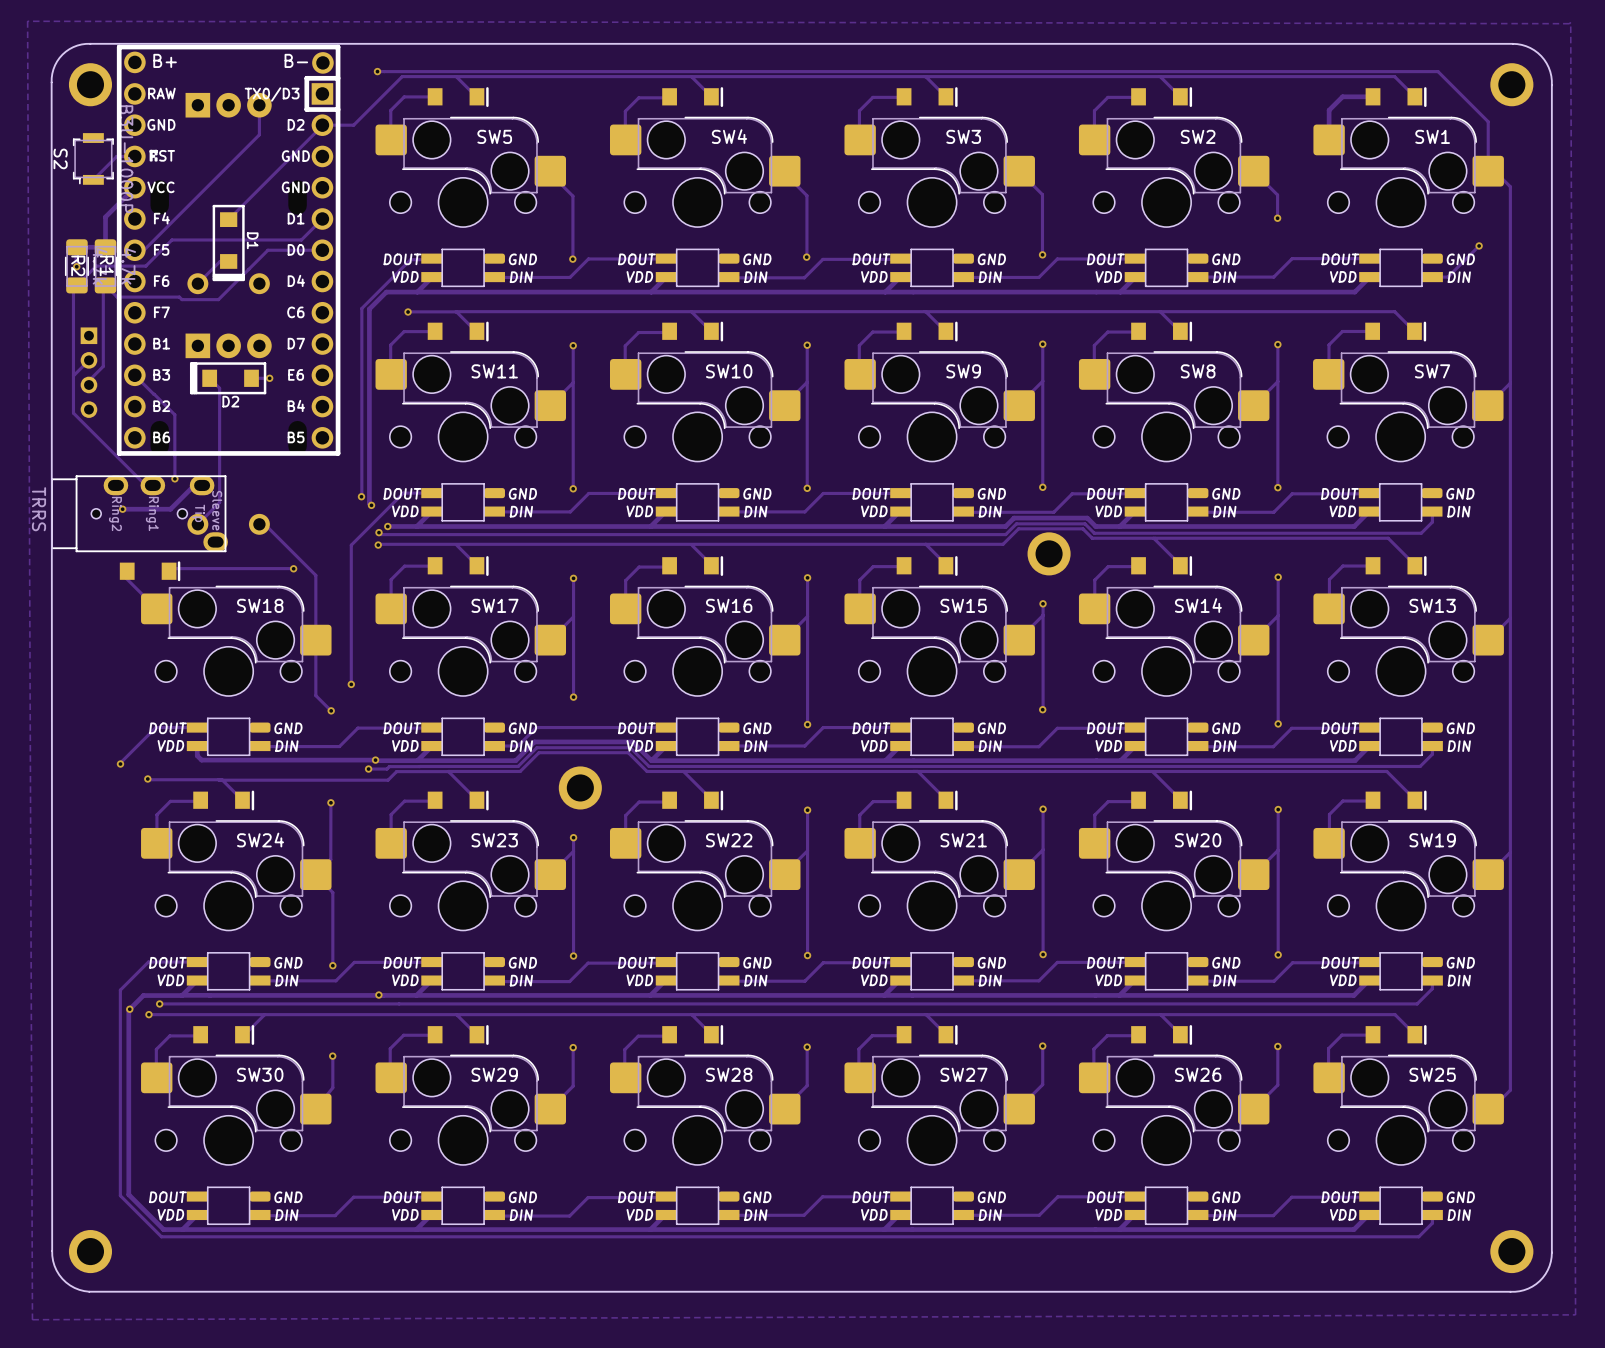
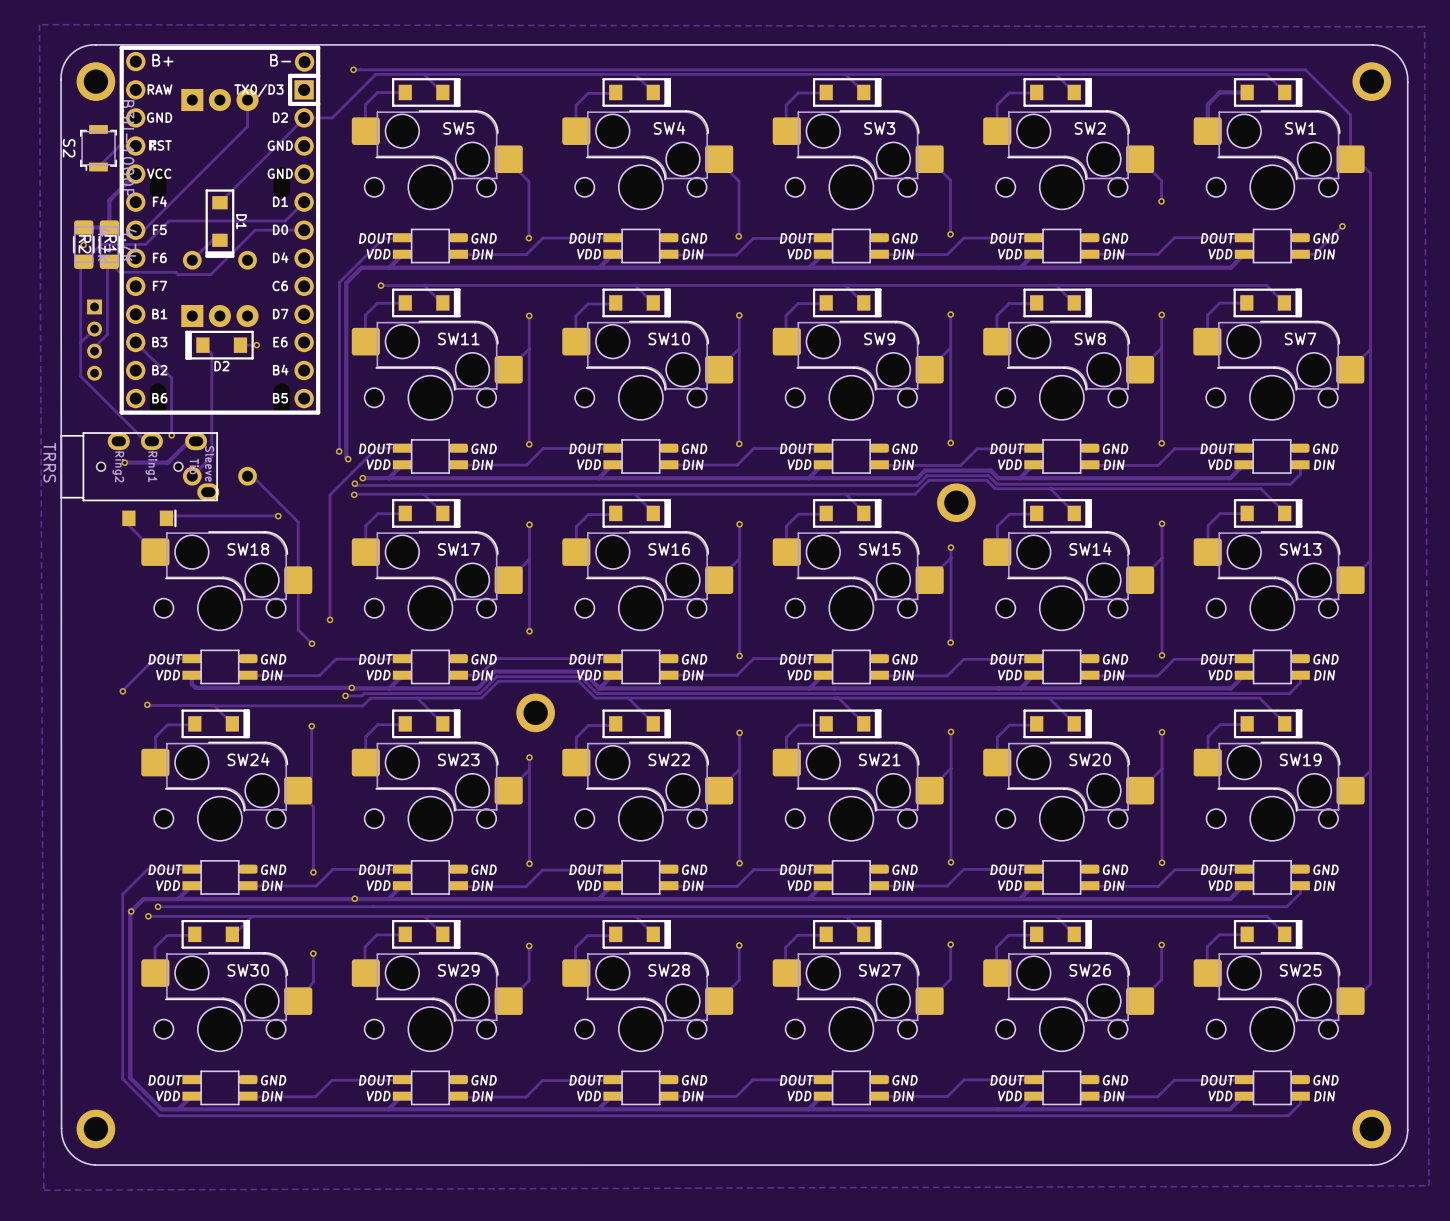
SW5 footprint: [375, 87, 567, 288] -> [351, 78, 523, 264]
SW4 footprint: [609, 87, 801, 288] -> [562, 78, 734, 264]
SW3 footprint: [844, 87, 1035, 288] -> [772, 78, 944, 264]
SW2 footprint: [1078, 87, 1270, 288] -> [983, 78, 1155, 264]
SW1 footprint: [1313, 87, 1504, 288] -> [1193, 78, 1365, 264]
SW11 footprint: [375, 321, 567, 522] -> [351, 288, 523, 474]
SW10 footprint: [609, 321, 801, 522] -> [562, 288, 734, 474]
SW9 footprint: [844, 321, 1035, 522] -> [772, 288, 944, 474]
SW8 footprint: [1078, 321, 1270, 522] -> [983, 288, 1155, 474]
SW7 footprint: [1313, 321, 1504, 522] -> [1193, 288, 1365, 474]
SW17 footprint: [375, 556, 567, 757] -> [351, 499, 523, 685]
SW16 footprint: [609, 556, 801, 757] -> [562, 499, 734, 685]
SW15 footprint: [844, 556, 1035, 757] -> [772, 499, 944, 685]
SW14 footprint: [1078, 556, 1270, 757] -> [983, 499, 1155, 685]
SW13 footprint: [1313, 556, 1504, 757] -> [1193, 499, 1365, 685]
SW24 footprint: [141, 790, 332, 991] -> [141, 709, 313, 895]
SW23 footprint: [375, 790, 567, 991] -> [351, 709, 523, 895]
SW22 footprint: [609, 790, 801, 991] -> [562, 709, 734, 895]
SW21 footprint: [844, 790, 1035, 991] -> [772, 709, 944, 895]
SW20 footprint: [1078, 790, 1270, 991] -> [983, 709, 1155, 895]
SW19 footprint: [1313, 790, 1504, 991] -> [1193, 709, 1365, 895]
SW30 footprint: [141, 1025, 332, 1225] -> [141, 920, 313, 1106]
SW29 footprint: [375, 1025, 567, 1225] -> [351, 920, 523, 1106]
SW28 footprint: [609, 1025, 801, 1225] -> [562, 920, 734, 1106]
SW27 footprint: [844, 1025, 1035, 1225] -> [772, 920, 944, 1106]
SW26 footprint: [1078, 1025, 1270, 1225] -> [983, 920, 1155, 1106]
SW25 footprint: [1313, 1025, 1504, 1225] -> [1193, 920, 1365, 1106]

